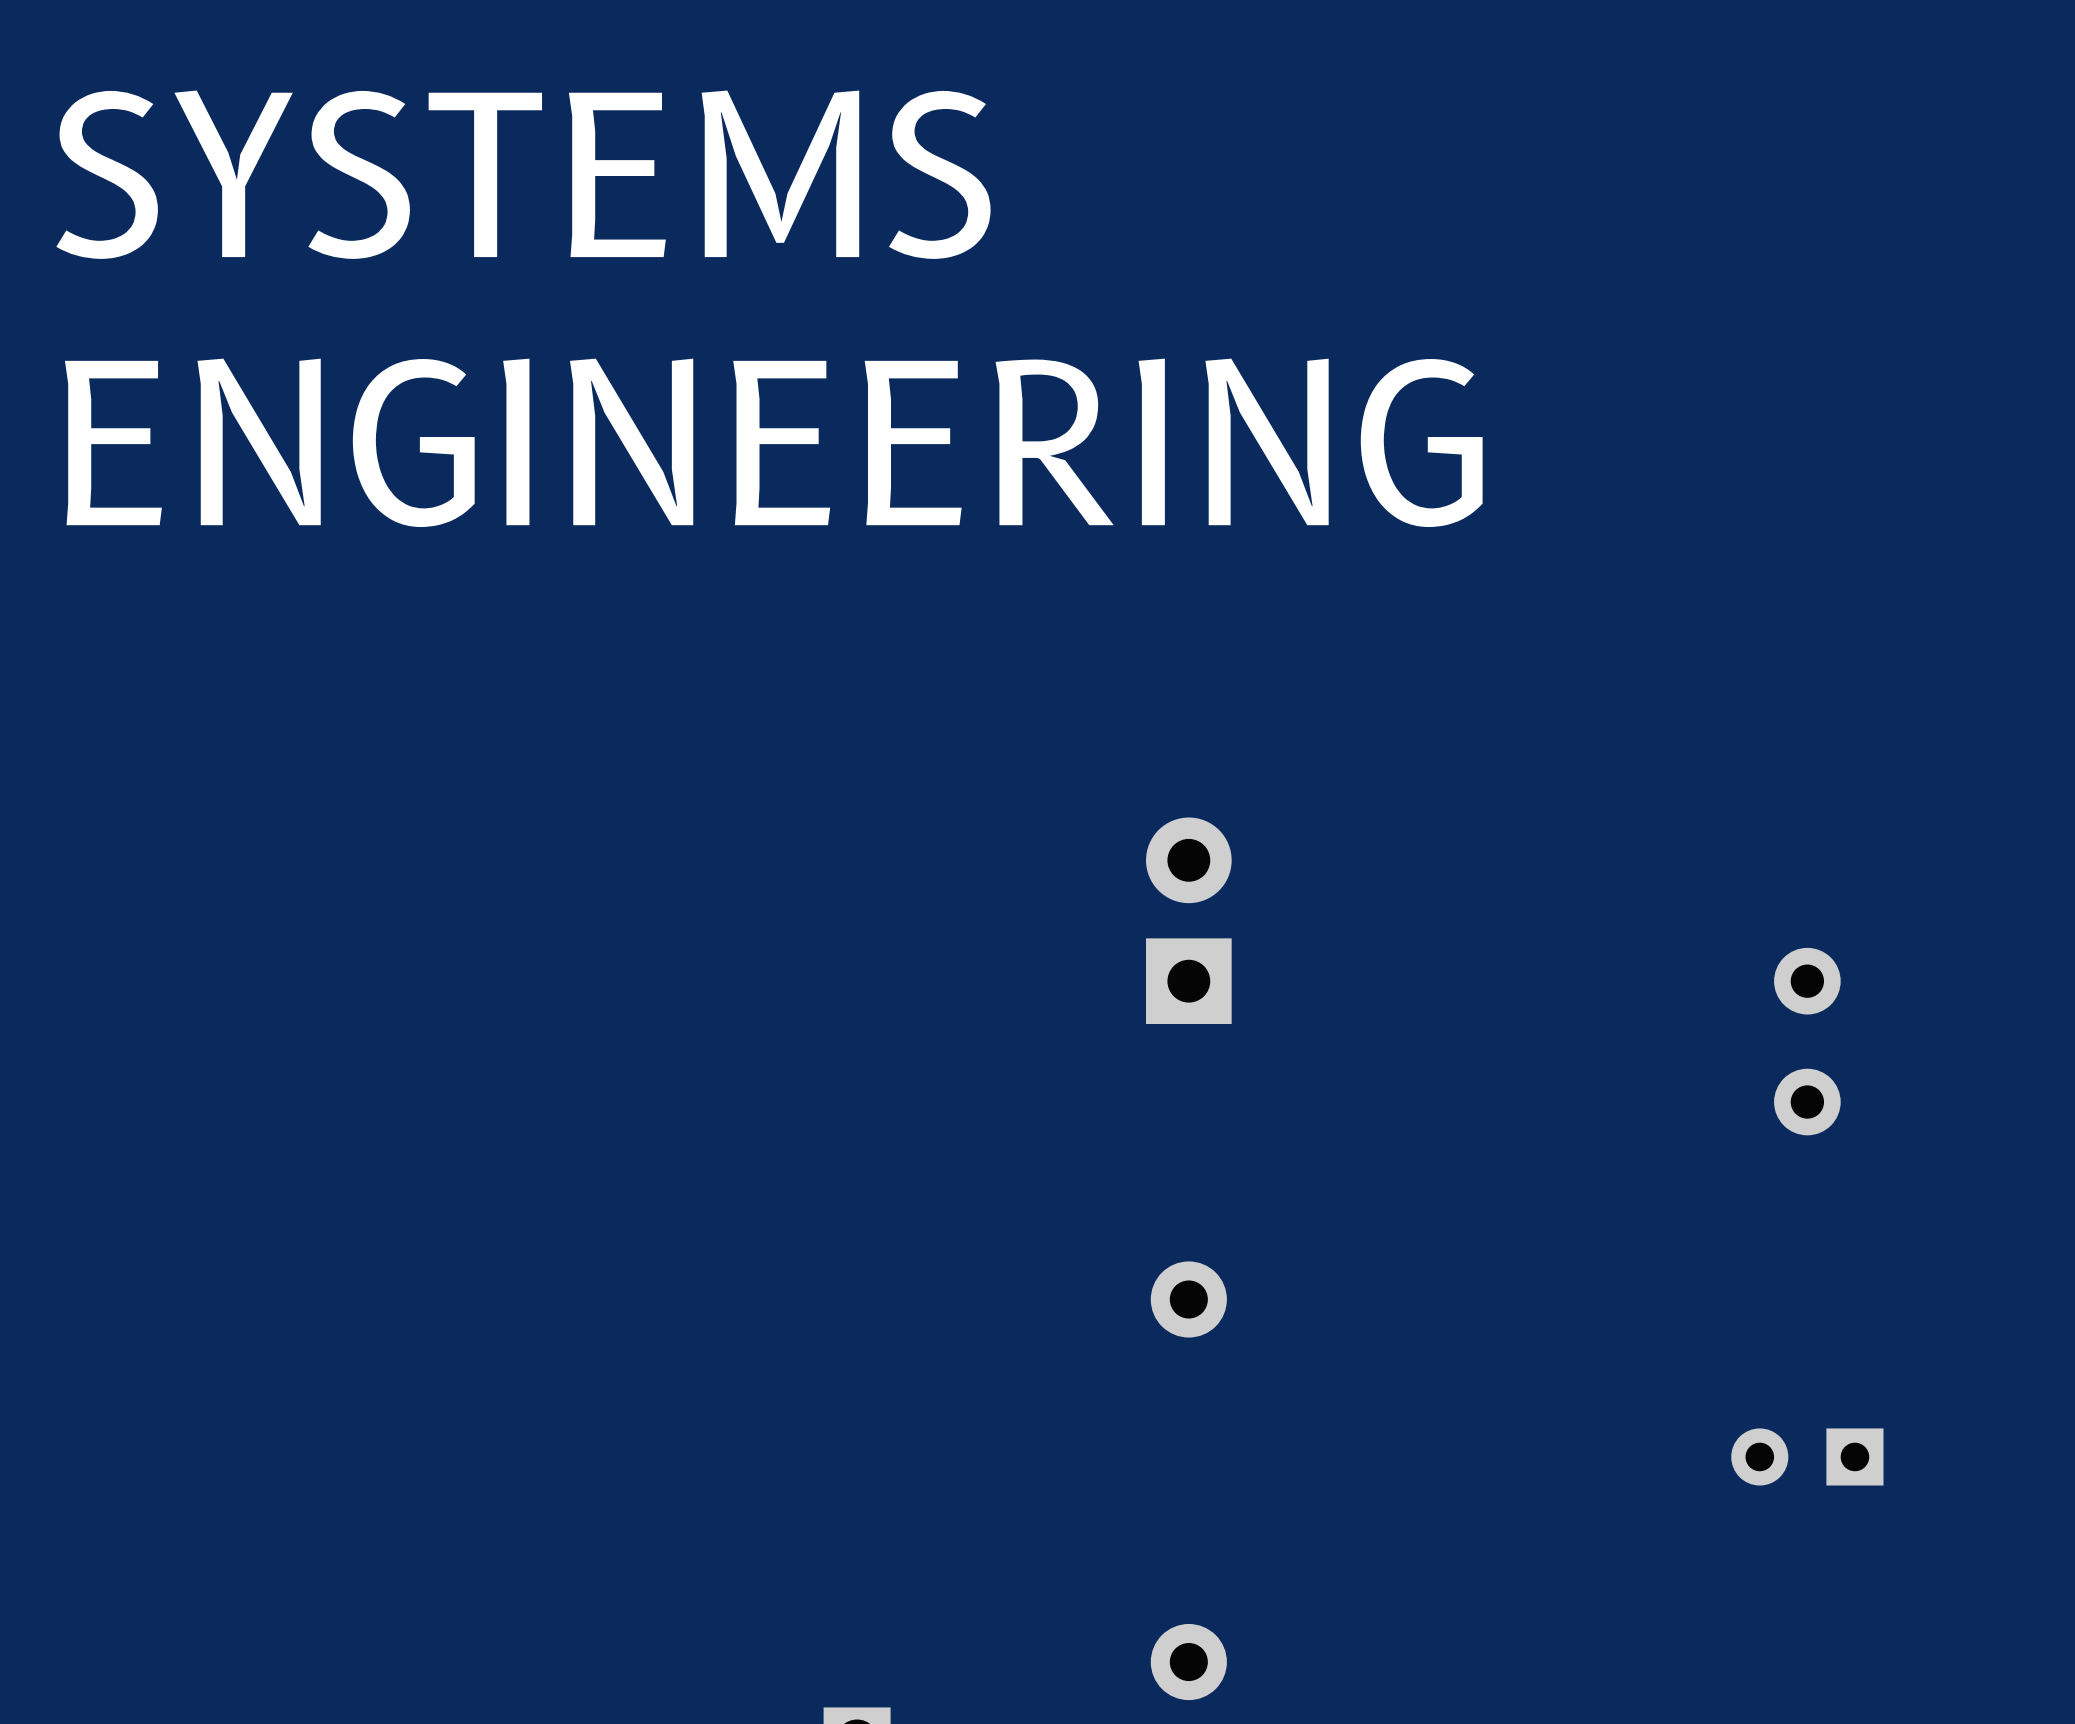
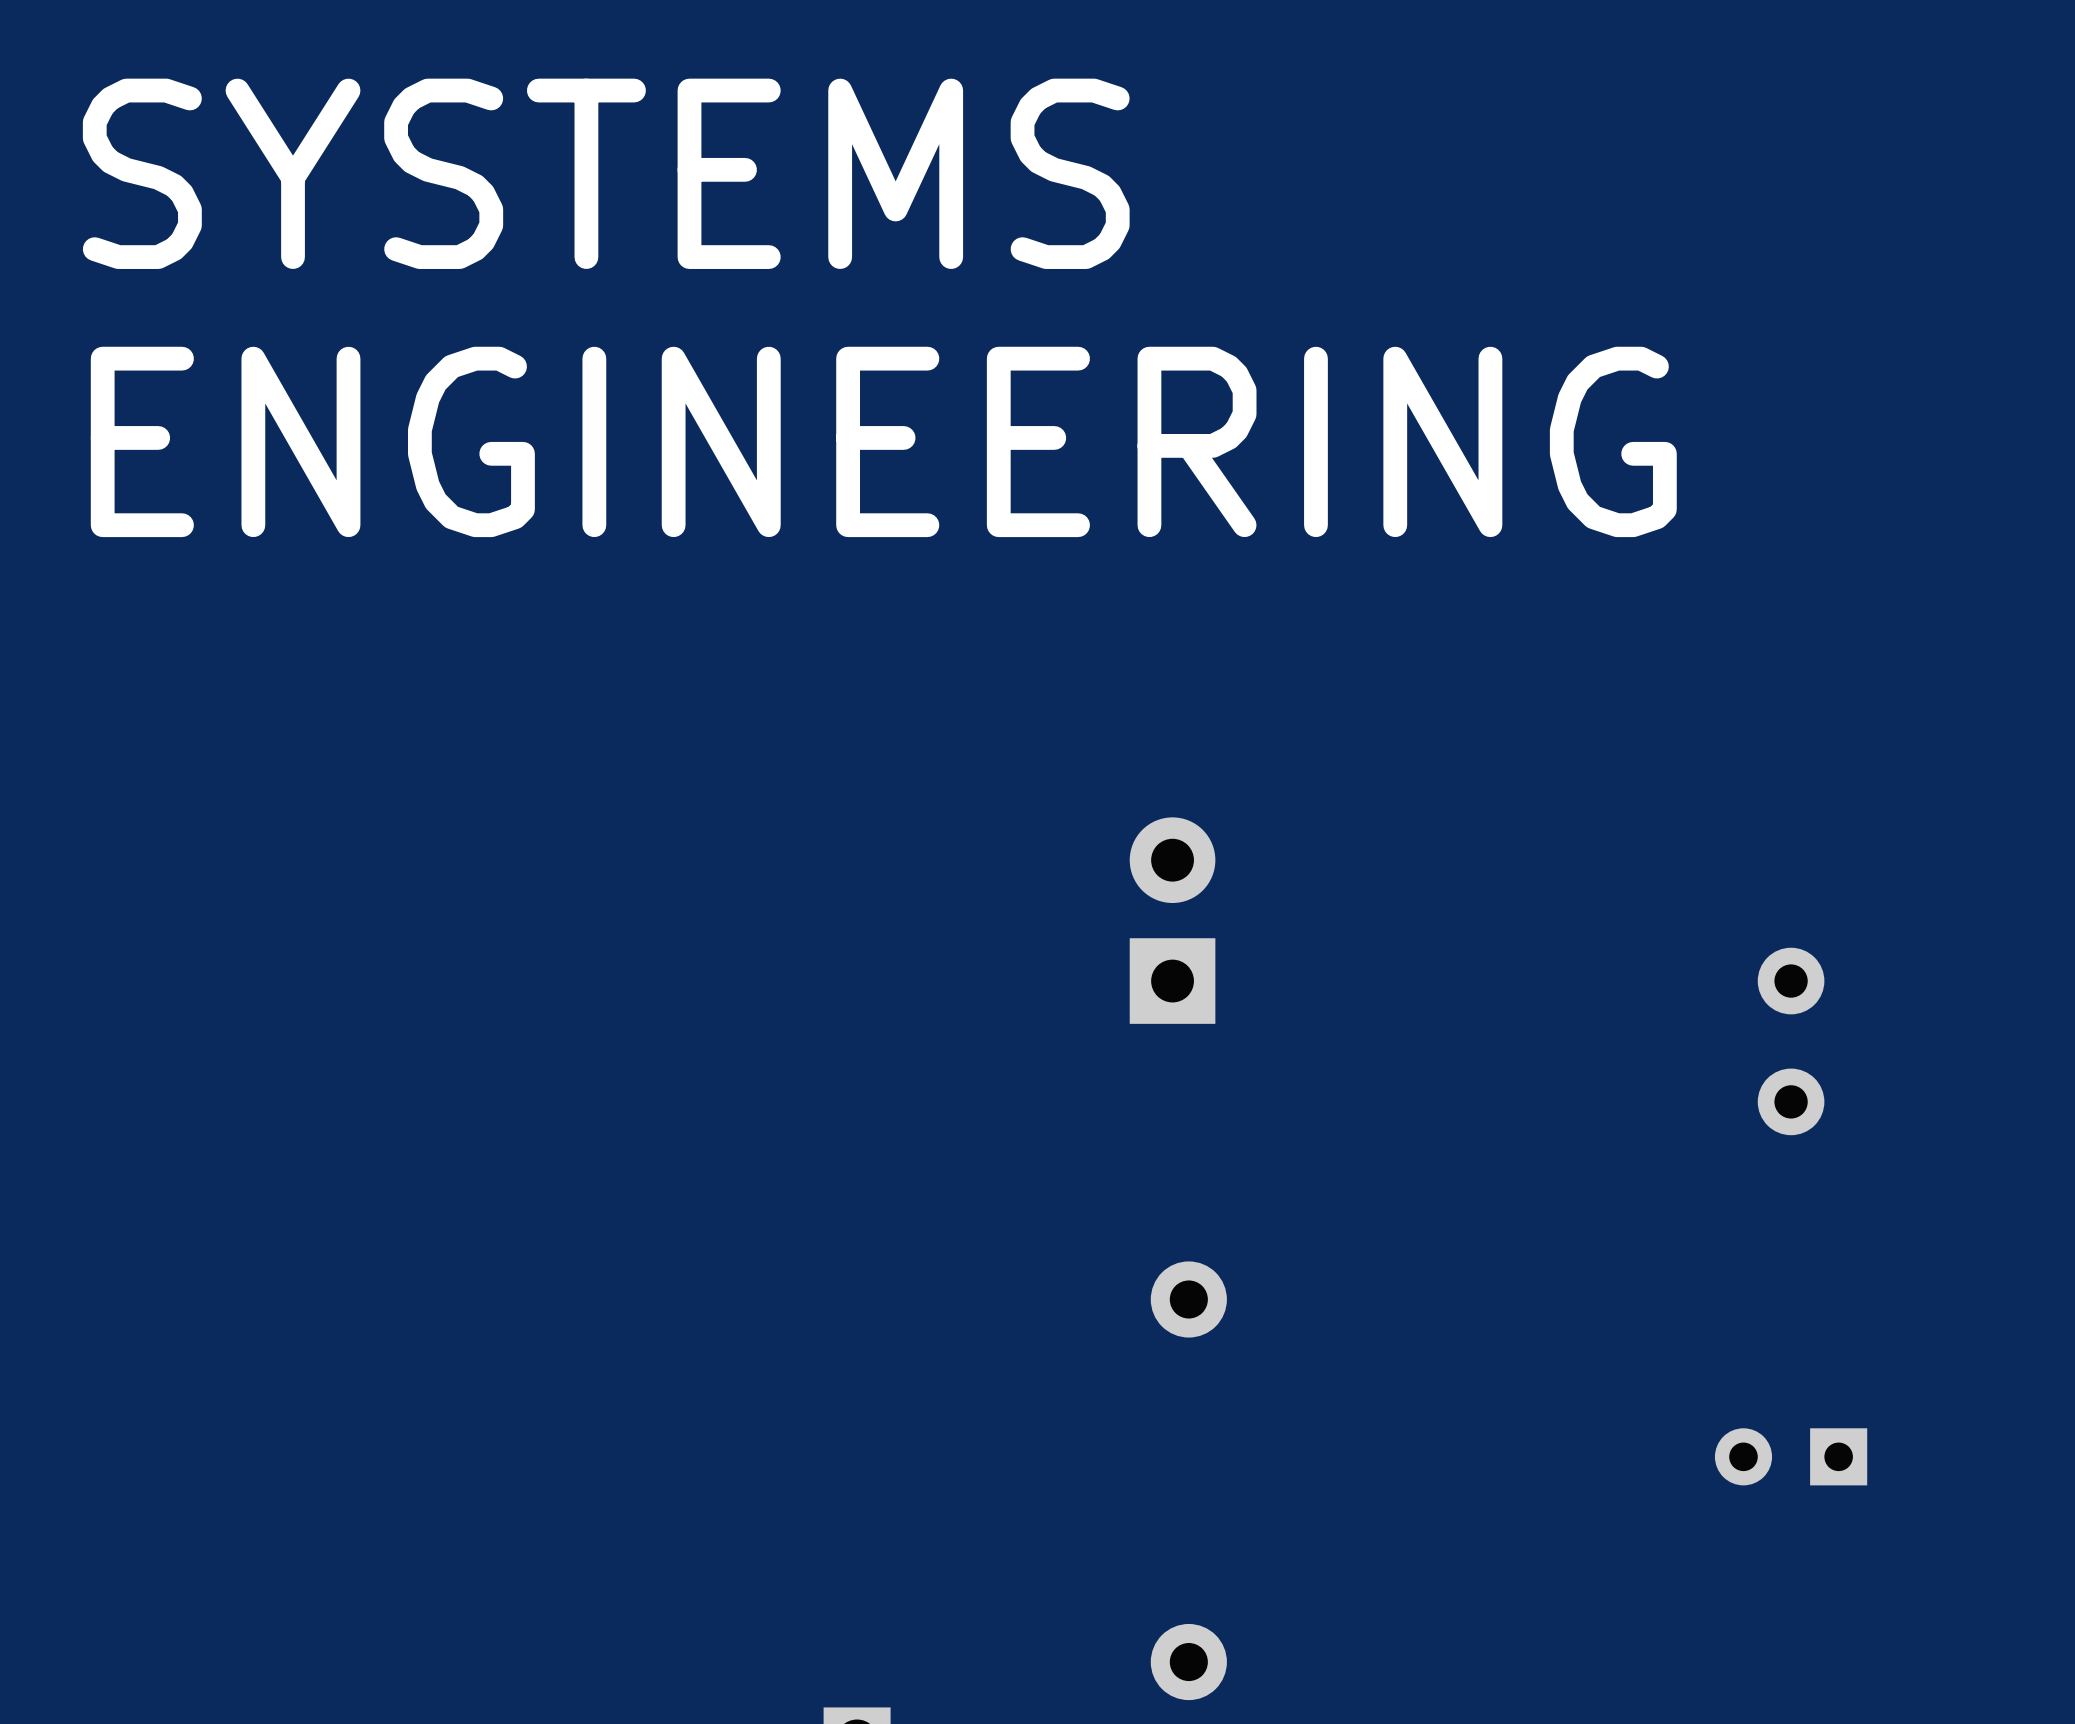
part position: (1188, 920) -> (1172, 920)
part position: (1807, 1041) -> (1791, 1041)
part position: (1807, 1456) -> (1791, 1456)

